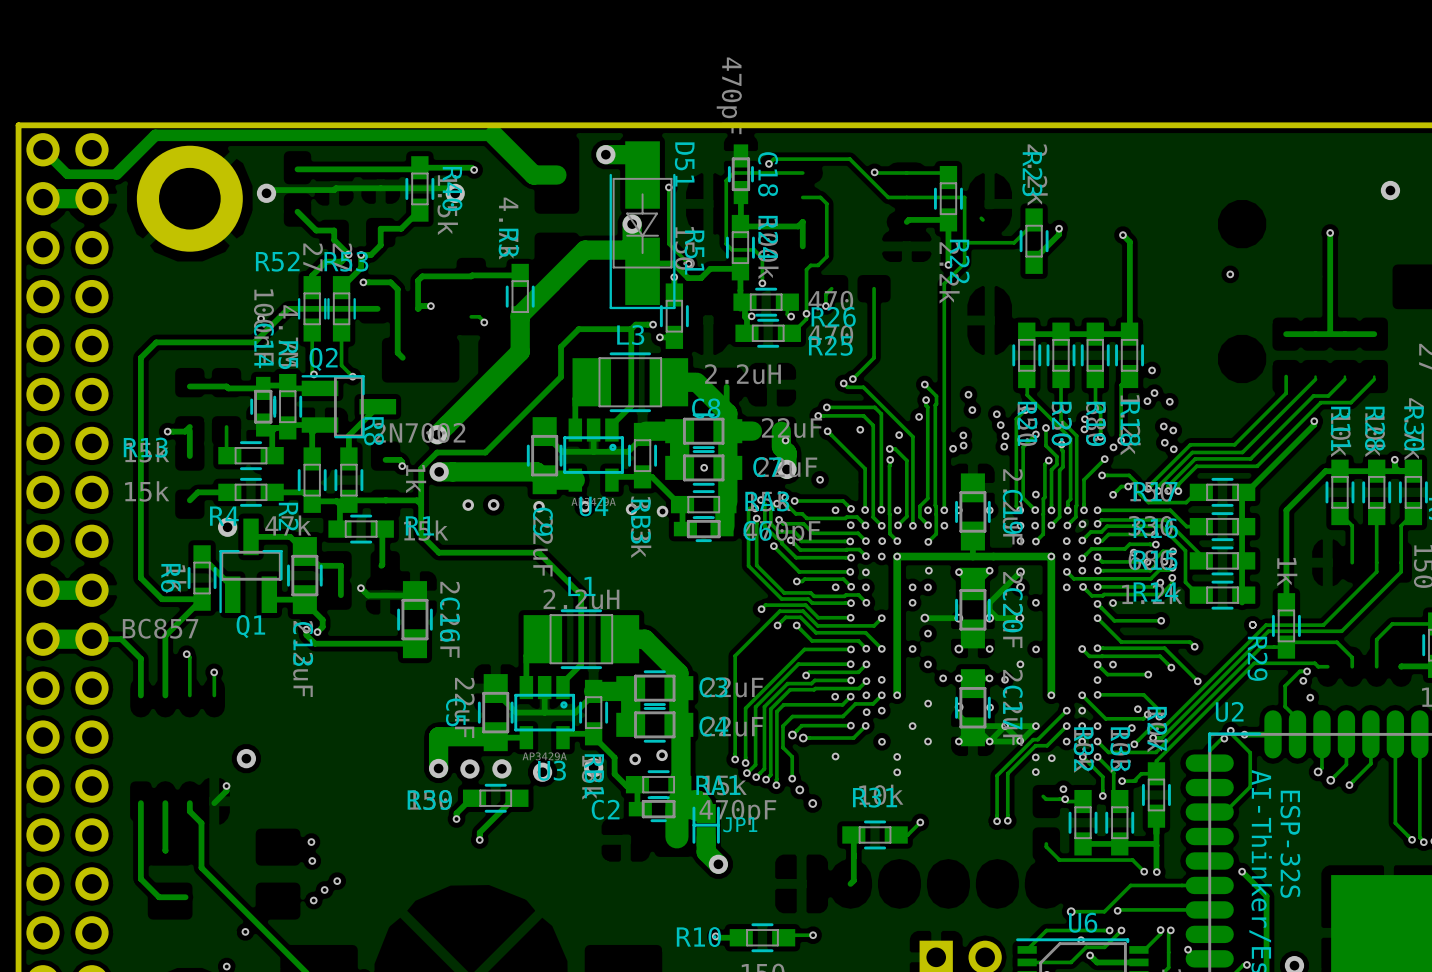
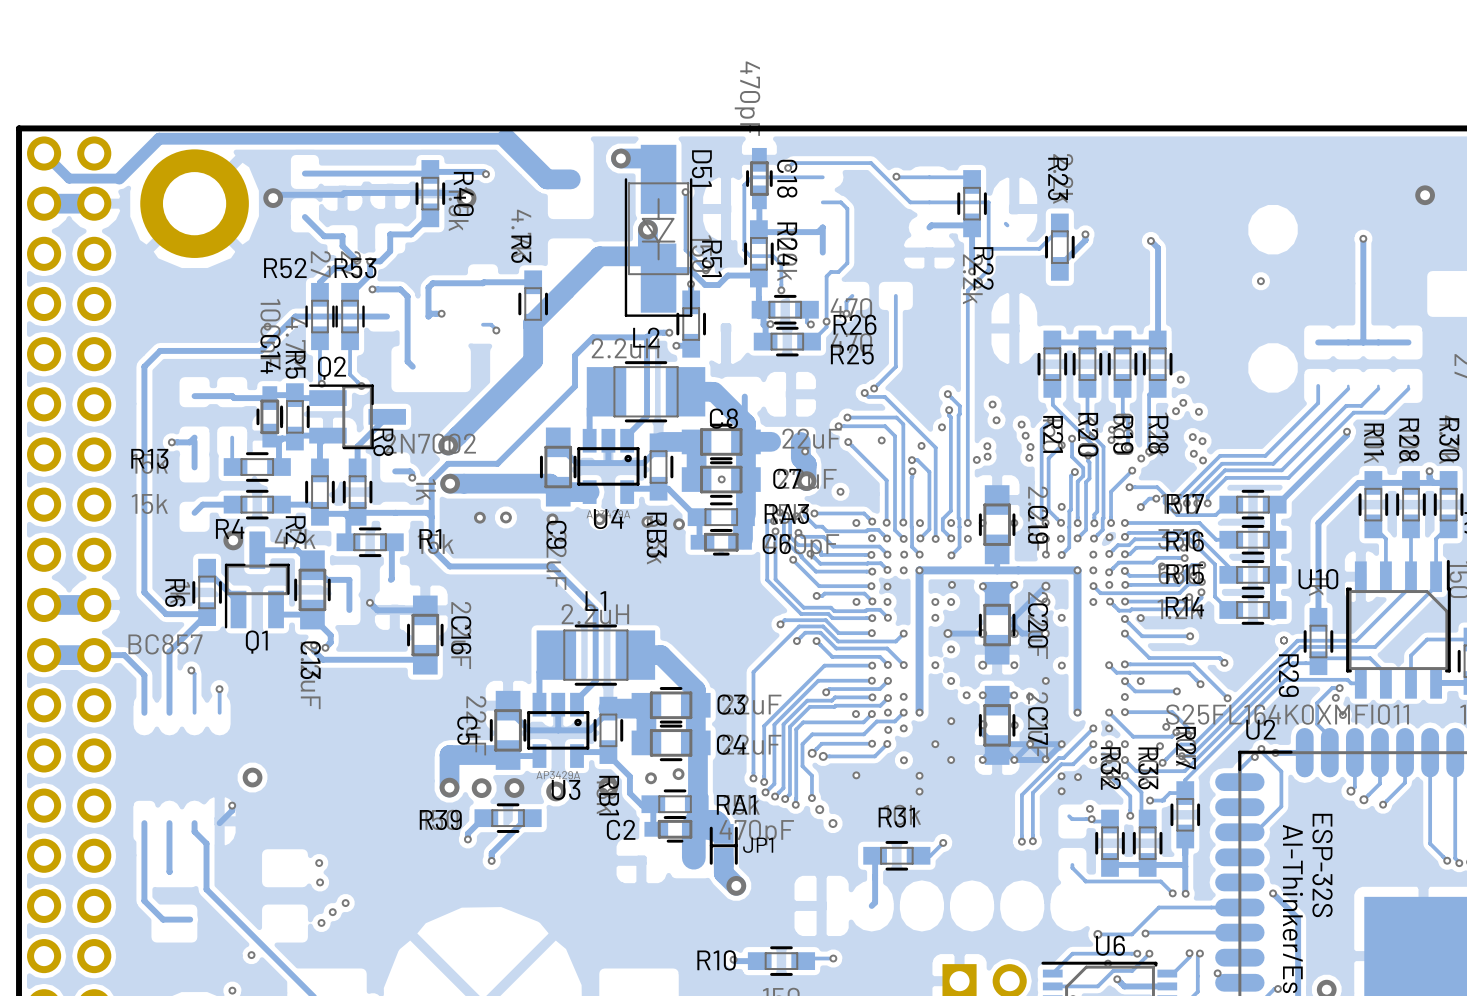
L3 name: L3 (630, 335) -> L2 (646, 337)
L3 value position: 2.2uH (742, 374) -> 2.2uH (625, 348)
U10: none -> S25FL164K0XMFI011 (1398, 629)

